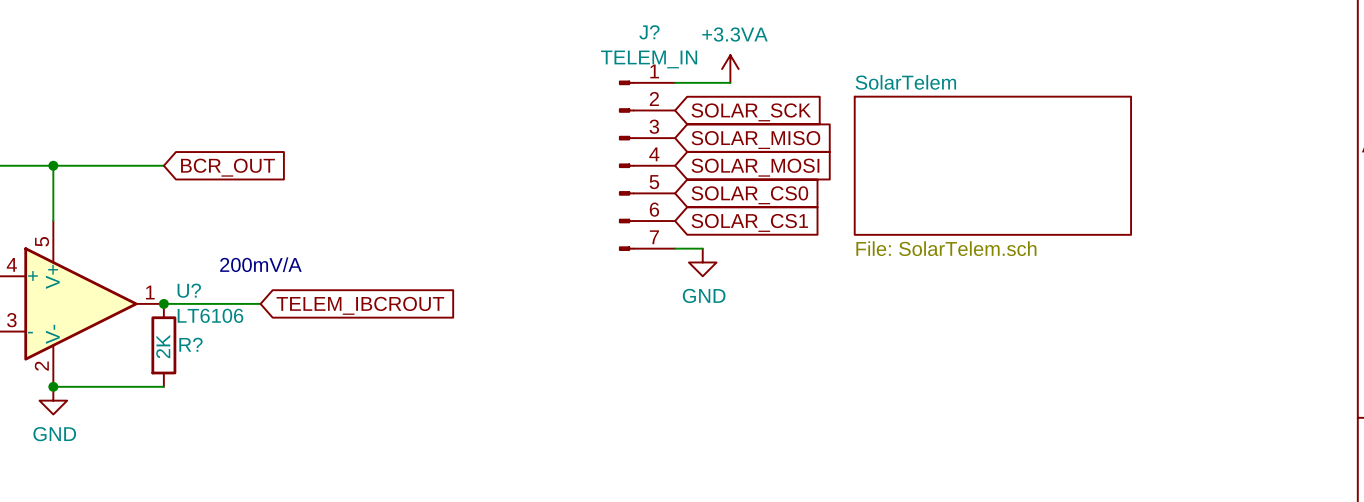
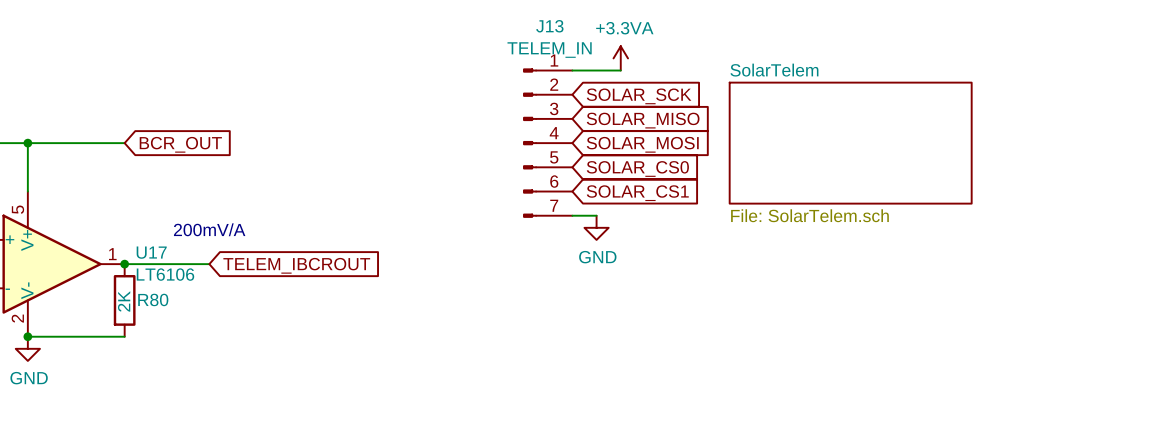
J? name: J? (649, 32) -> J13 (549, 26)
U? name: U? (189, 290) -> U17 (151, 252)
R? name: R? (190, 344) -> R80 (153, 299)

